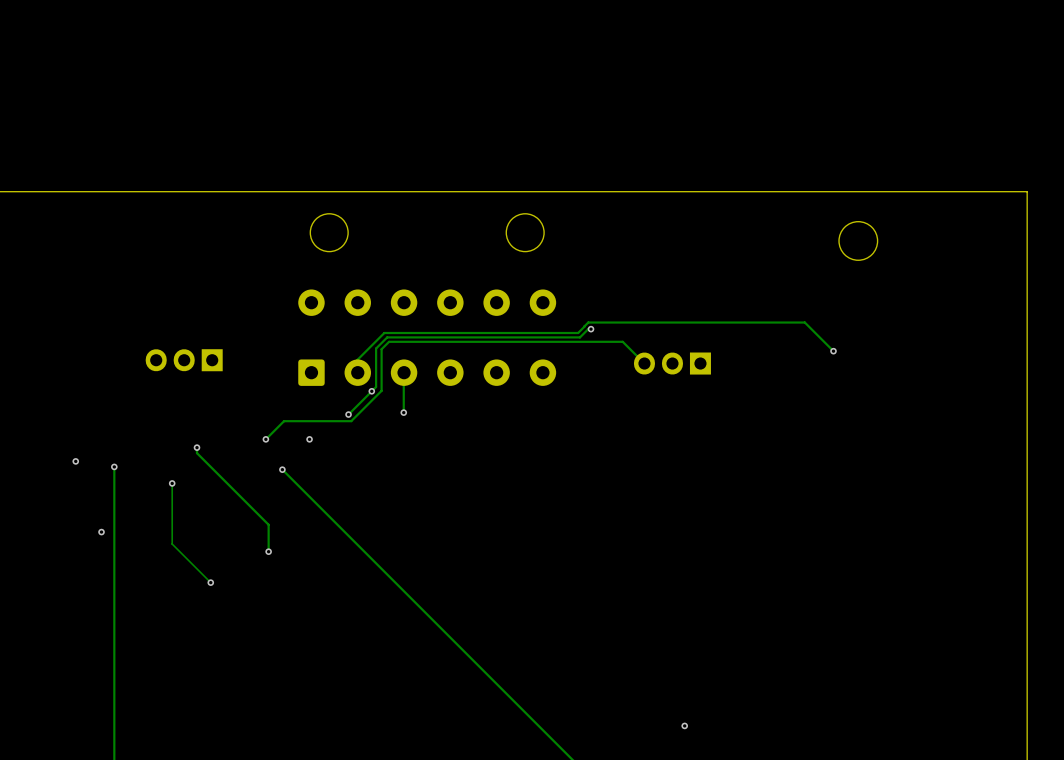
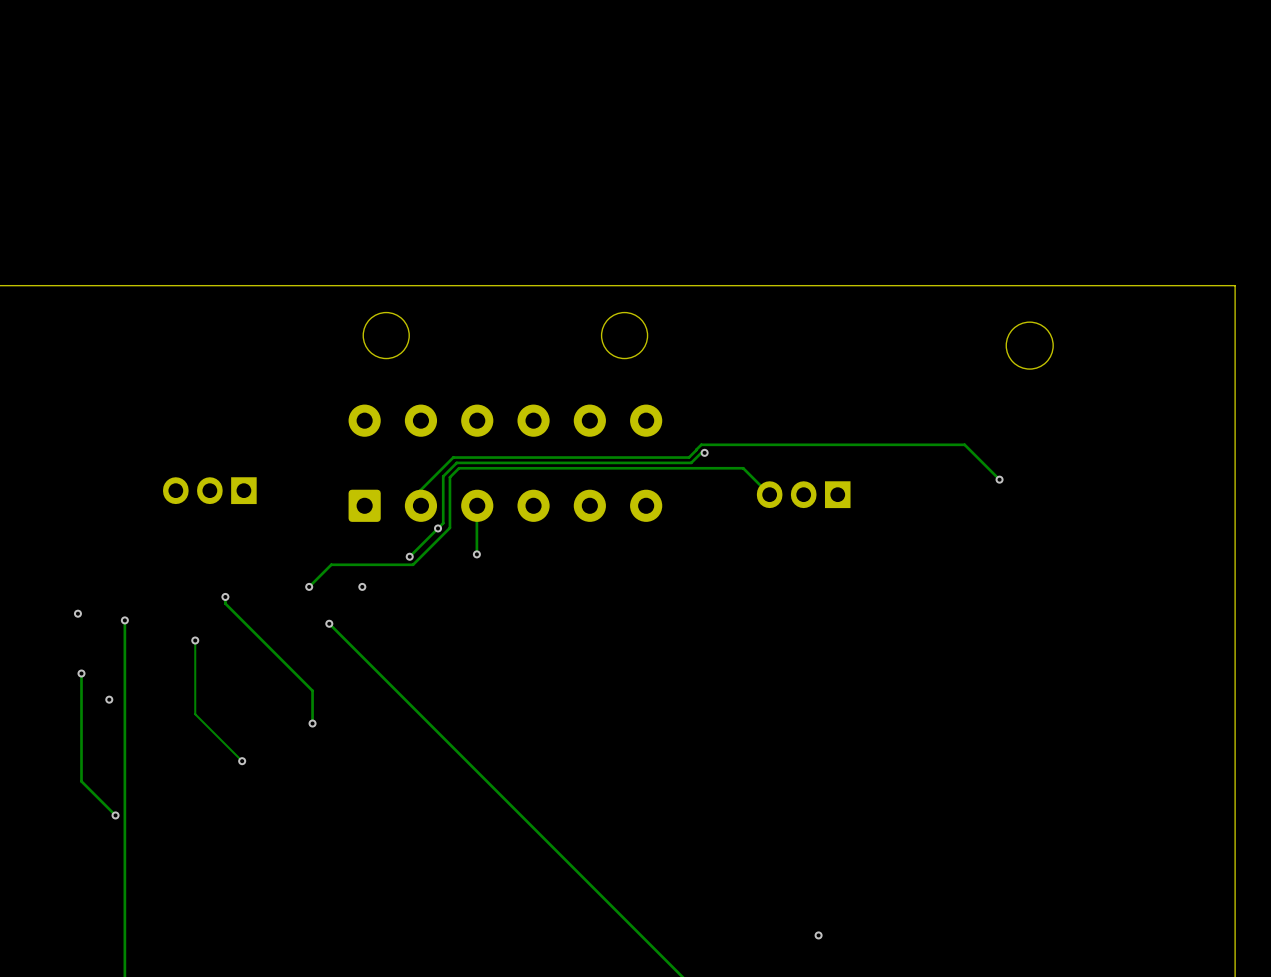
track: none -> (81, 673) (81, 781) (115, 815)
via: none -> (81, 673)
via: none -> (115, 815)

